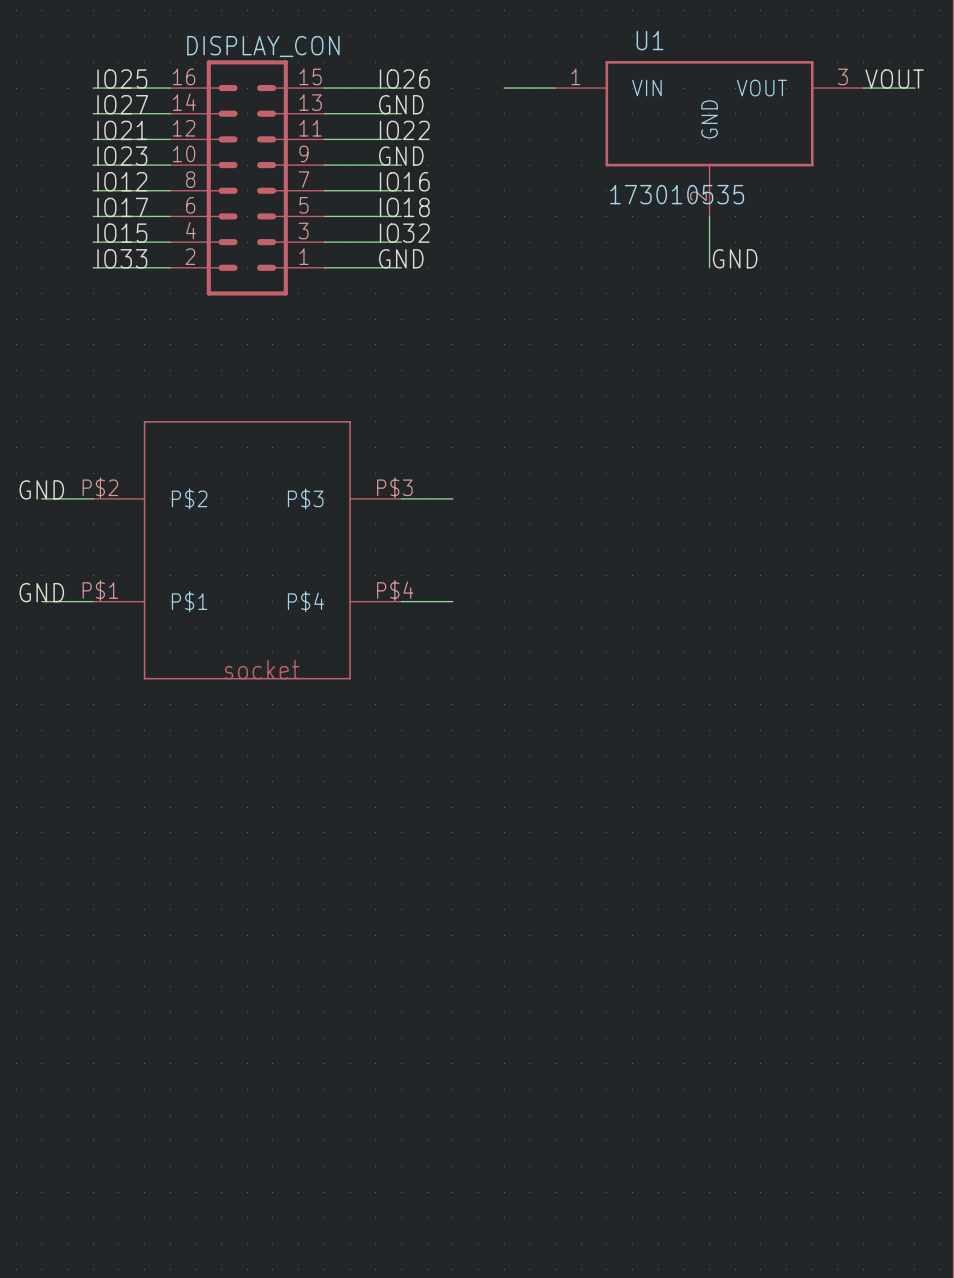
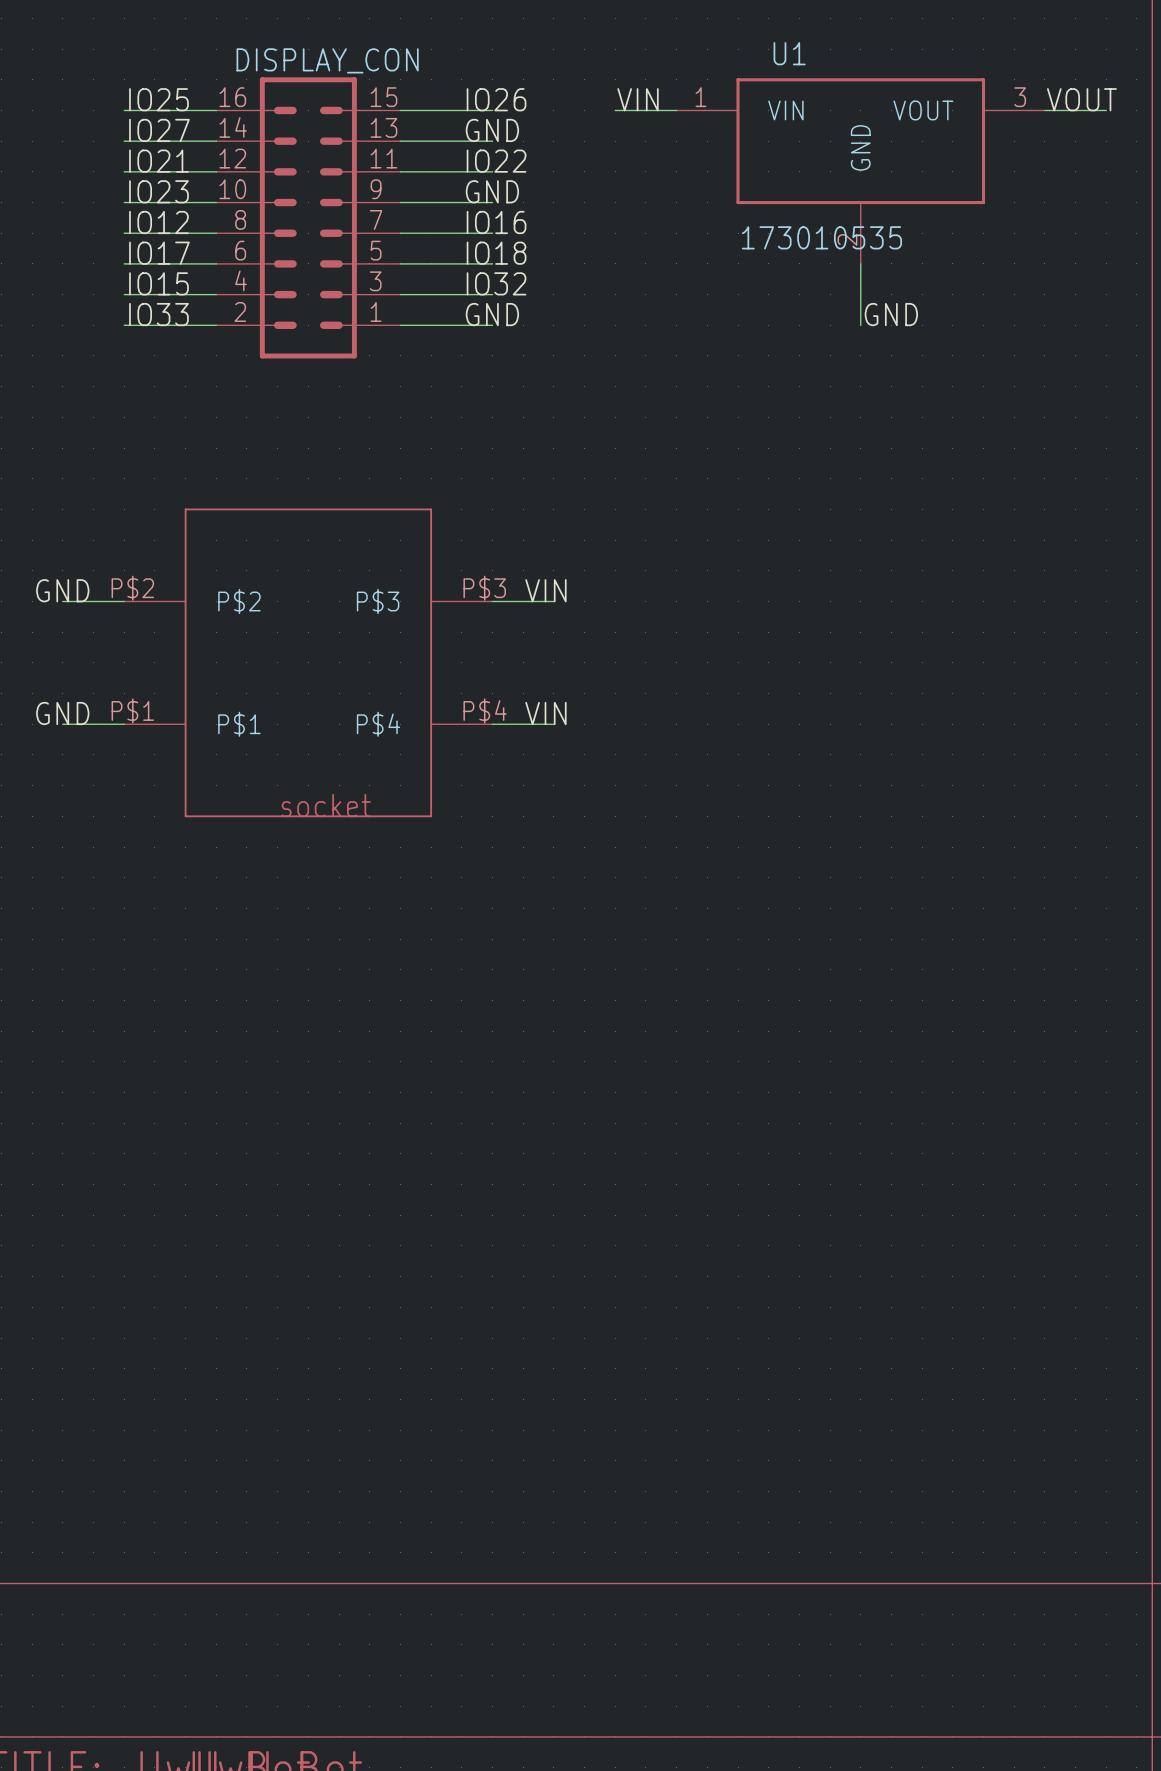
label: none -> VIN (638, 99)
label: none -> VIN (545, 590)
label: none -> VIN (545, 713)

